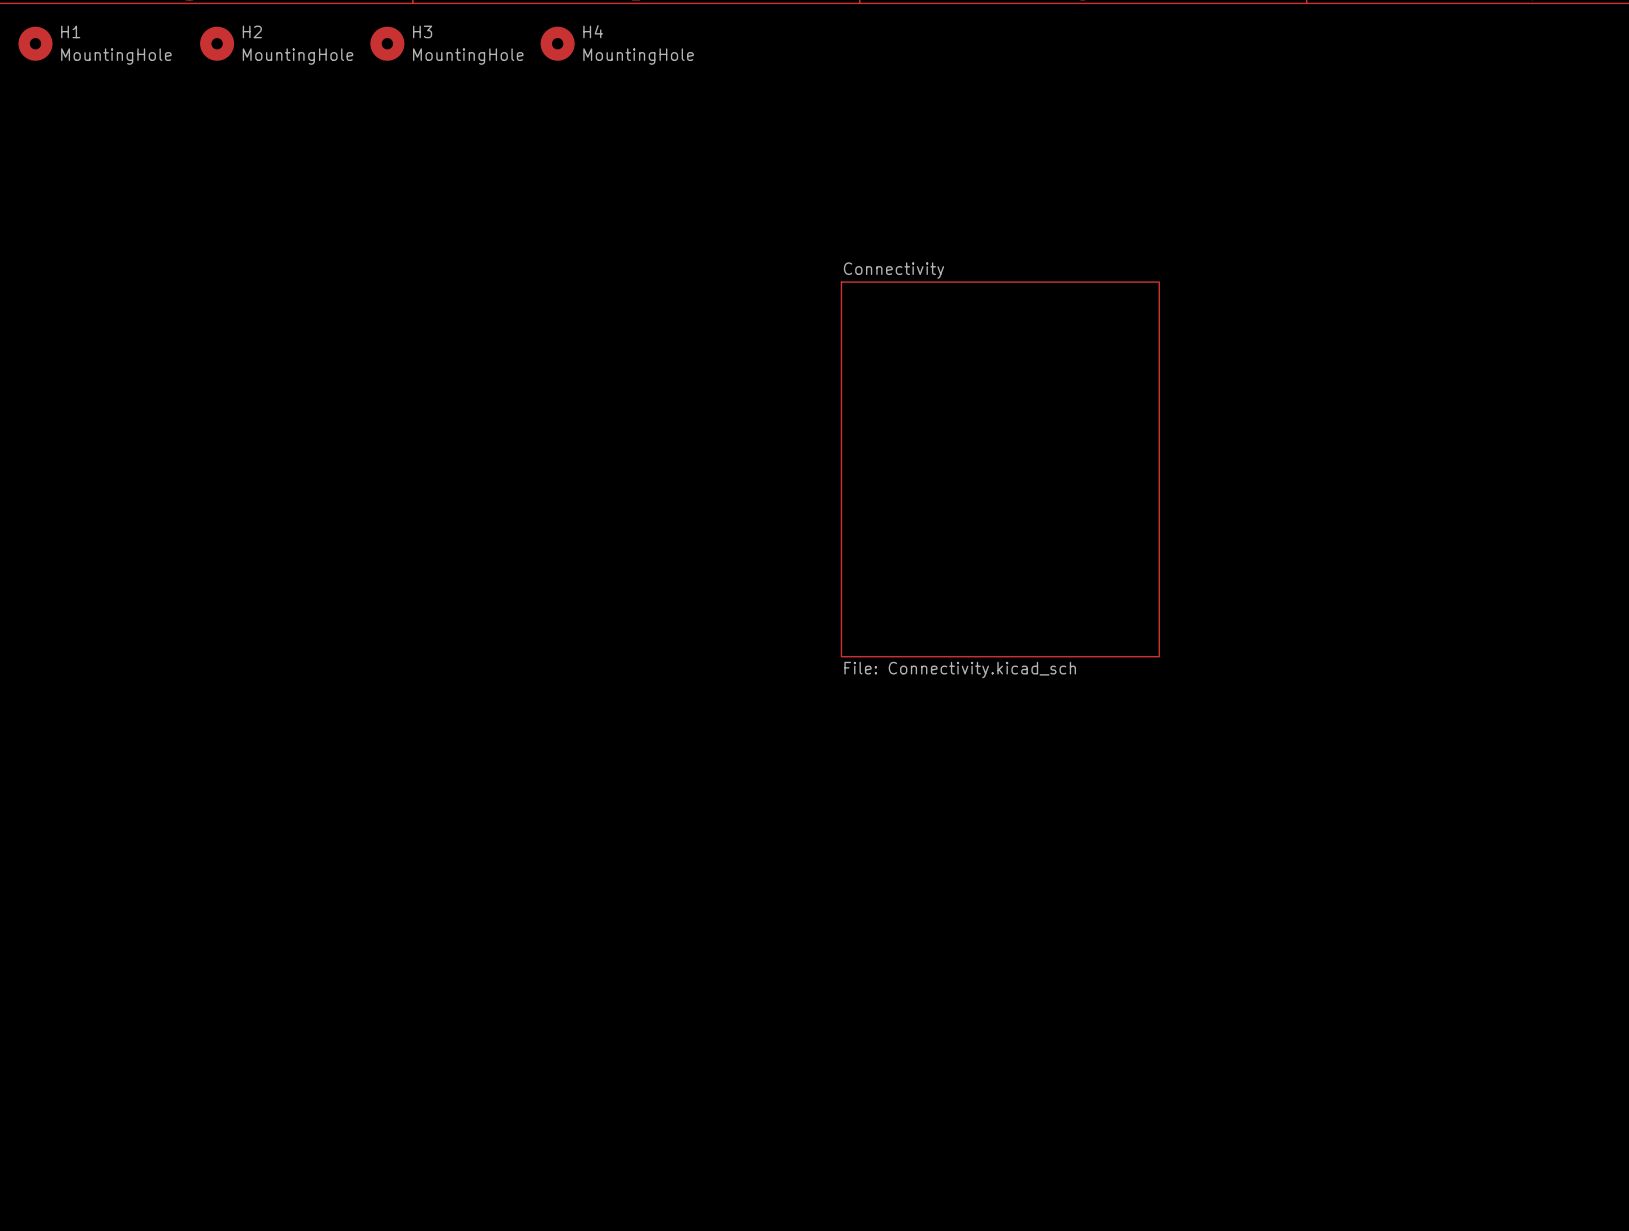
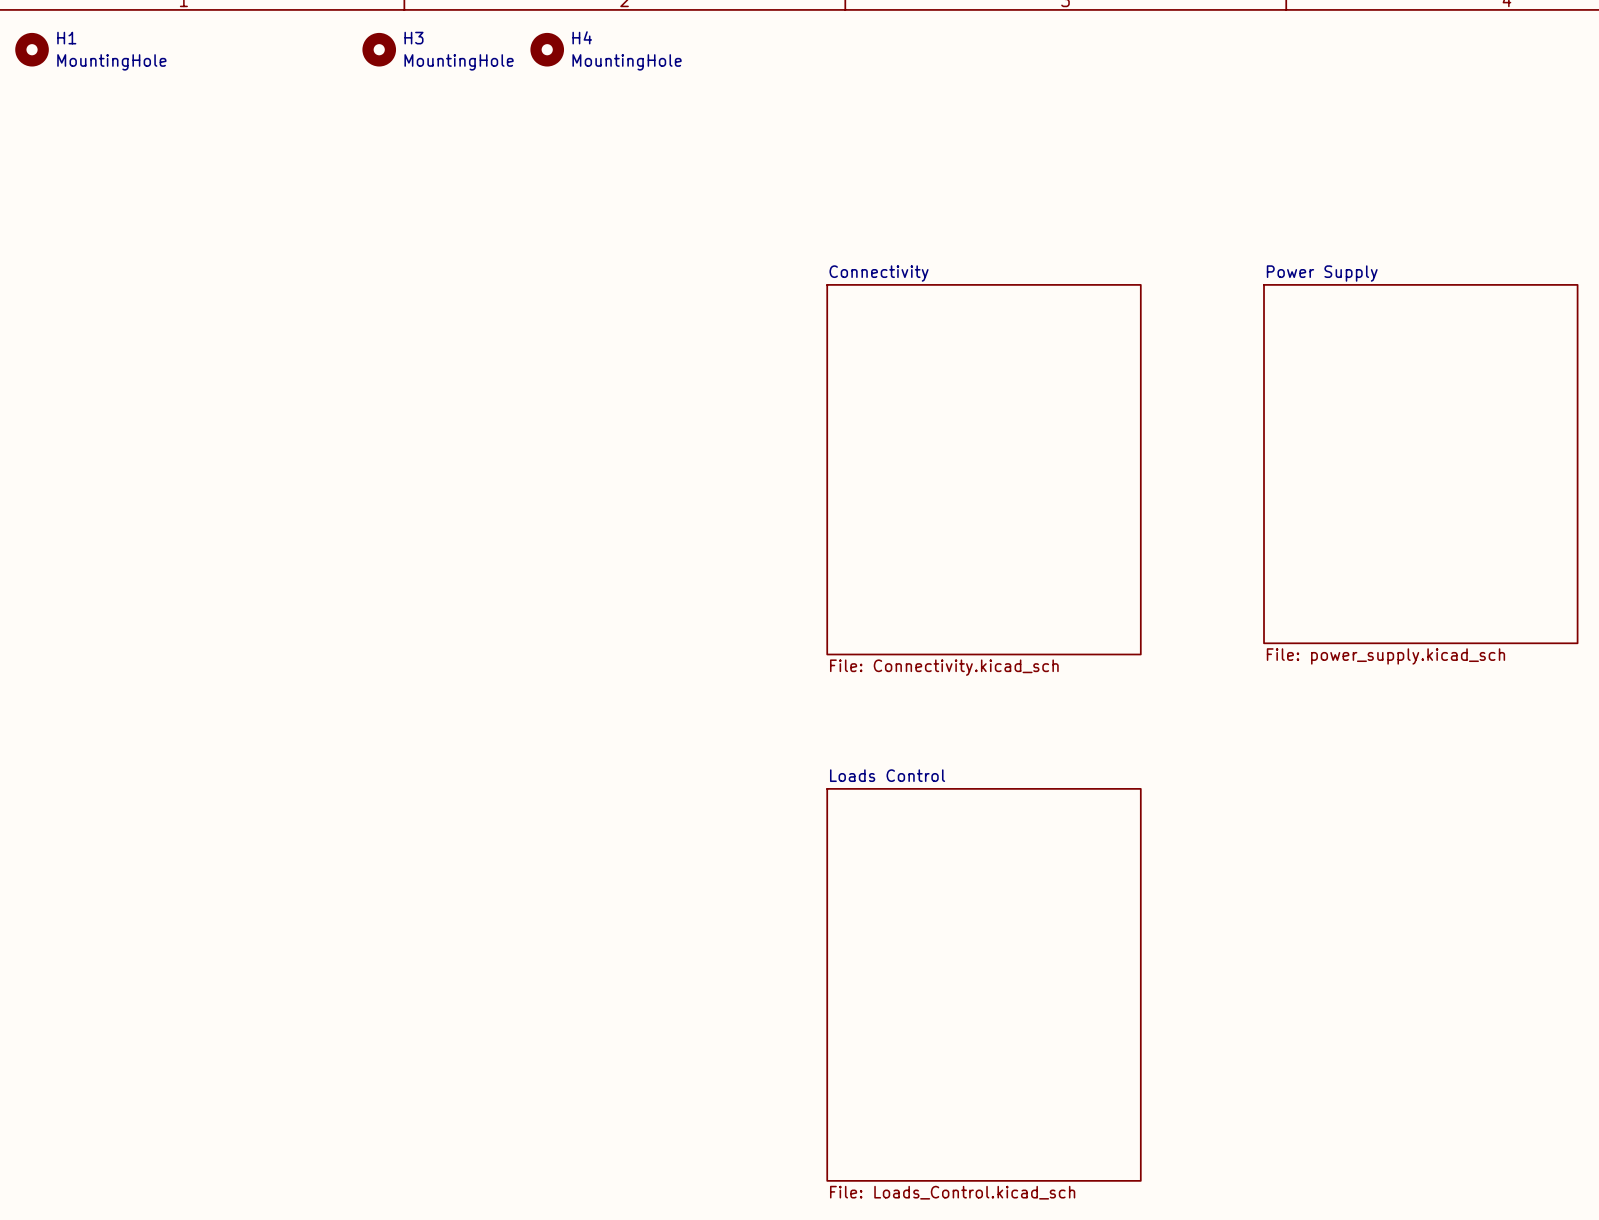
H2: MountingHole (217, 43) -> none
sheet Power Supply: none -> File: power_supply.kicad_sch (1420, 464)
sheet Loads Control: none -> File: Loads_Control.kicad_sch (984, 984)

